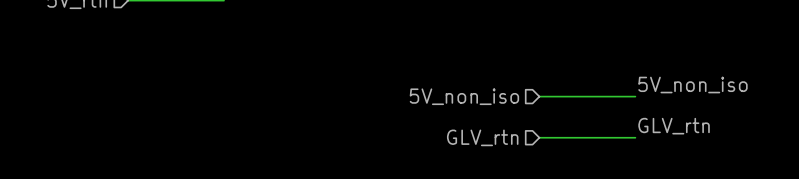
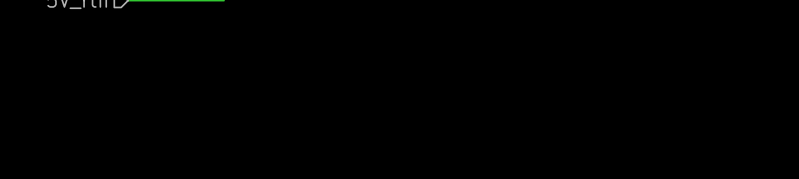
label: 5V_non_iso (692, 85) -> none
hierarchical label: 5V_non_iso (464, 96) -> none
wire: (539, 96) (635, 96) -> none
label: GLV_rtn (674, 126) -> none
hierarchical label: GLV_rtn (482, 137) -> none
wire: (539, 137) (635, 137) -> none

